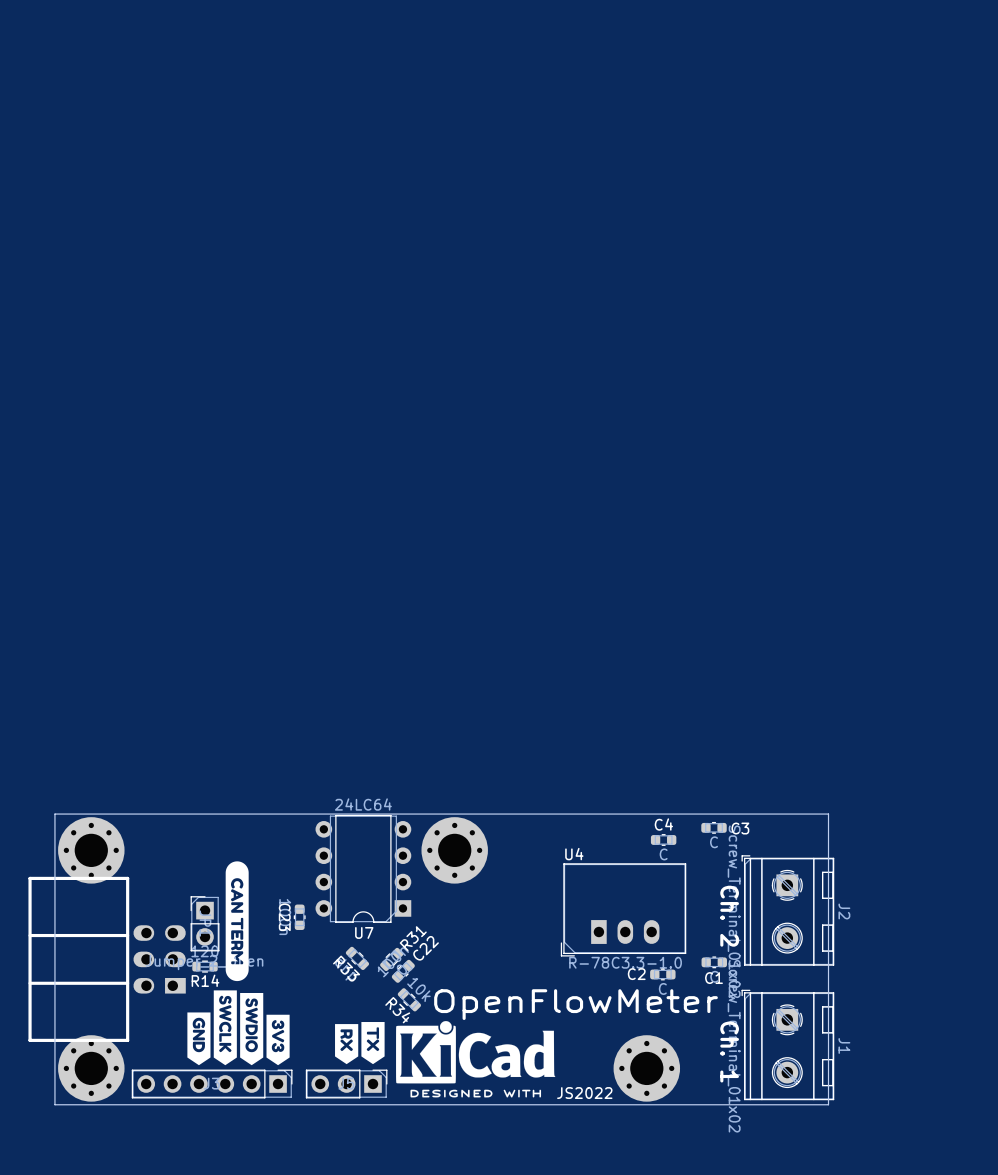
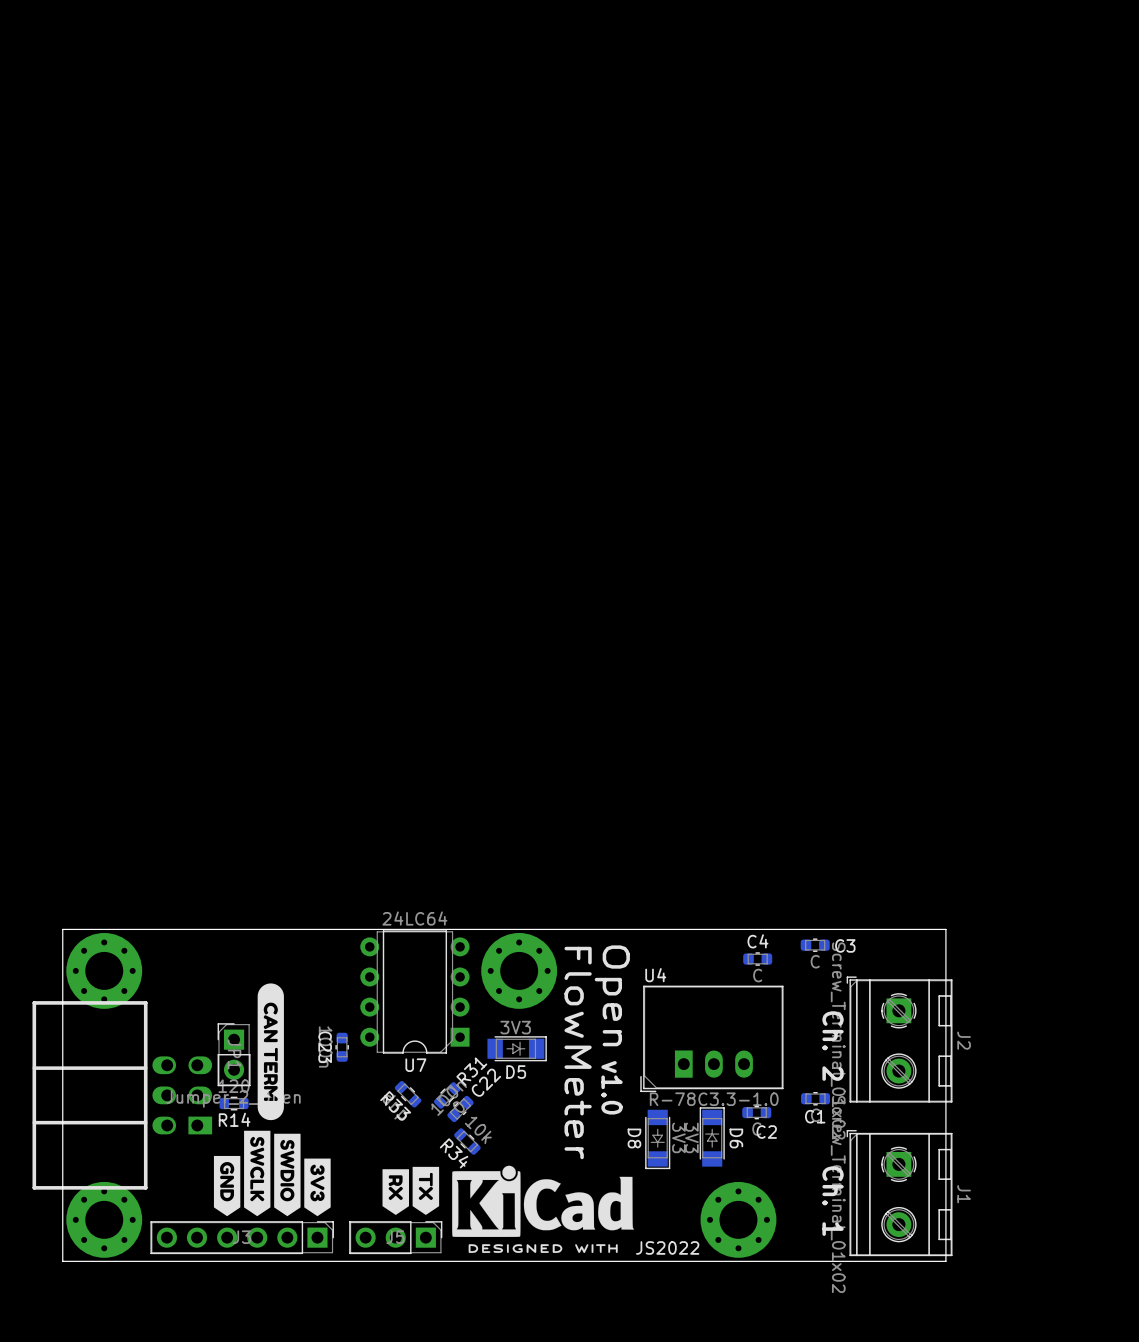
text: none -> Open (612, 995)
D5: none -> 3V3 (517, 1048)
text: none -> v1.0 (612, 1087)
C2 name position: C2 (636, 974) -> C2 (766, 1132)
D6: none -> 3V3 (712, 1136)
D8: none -> 3V3 (657, 1139)
text: OpenFlowMeter (575, 1004) -> FlowMeter (578, 1052)

